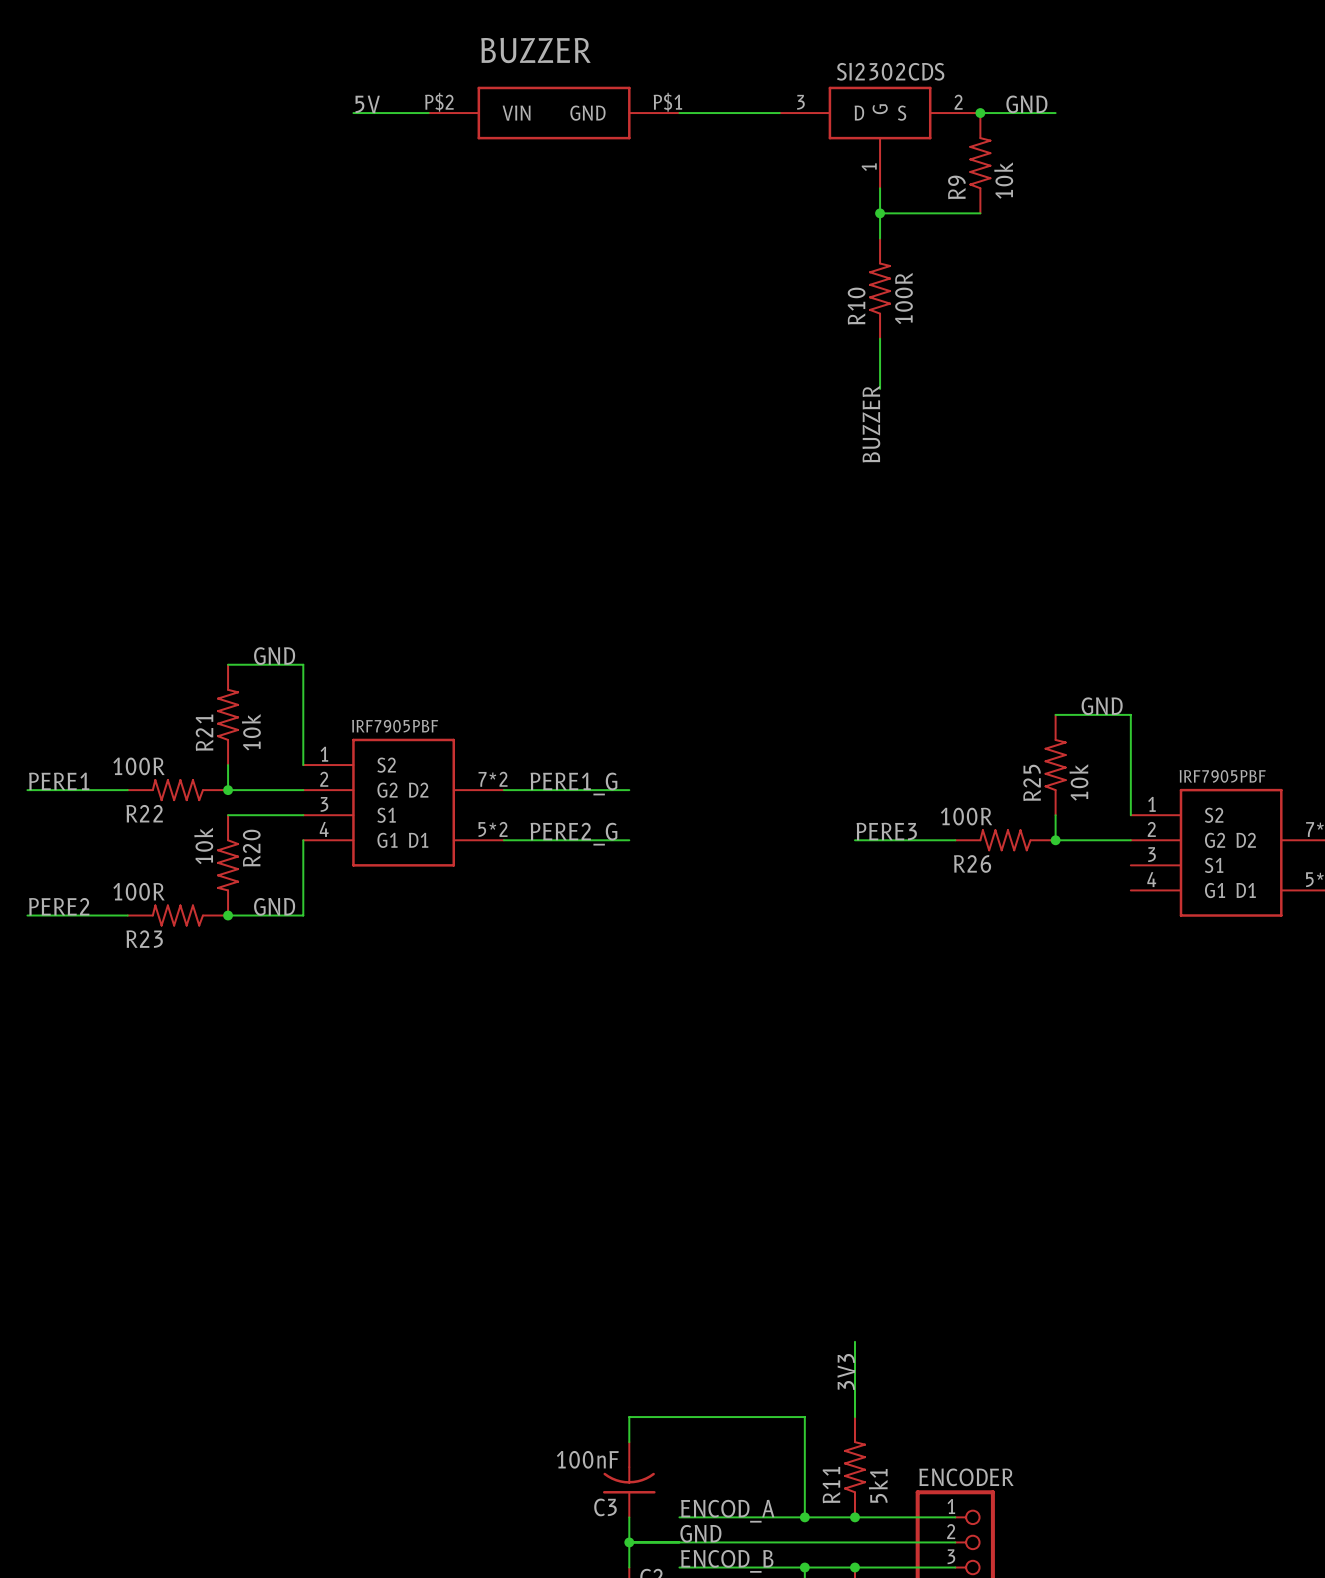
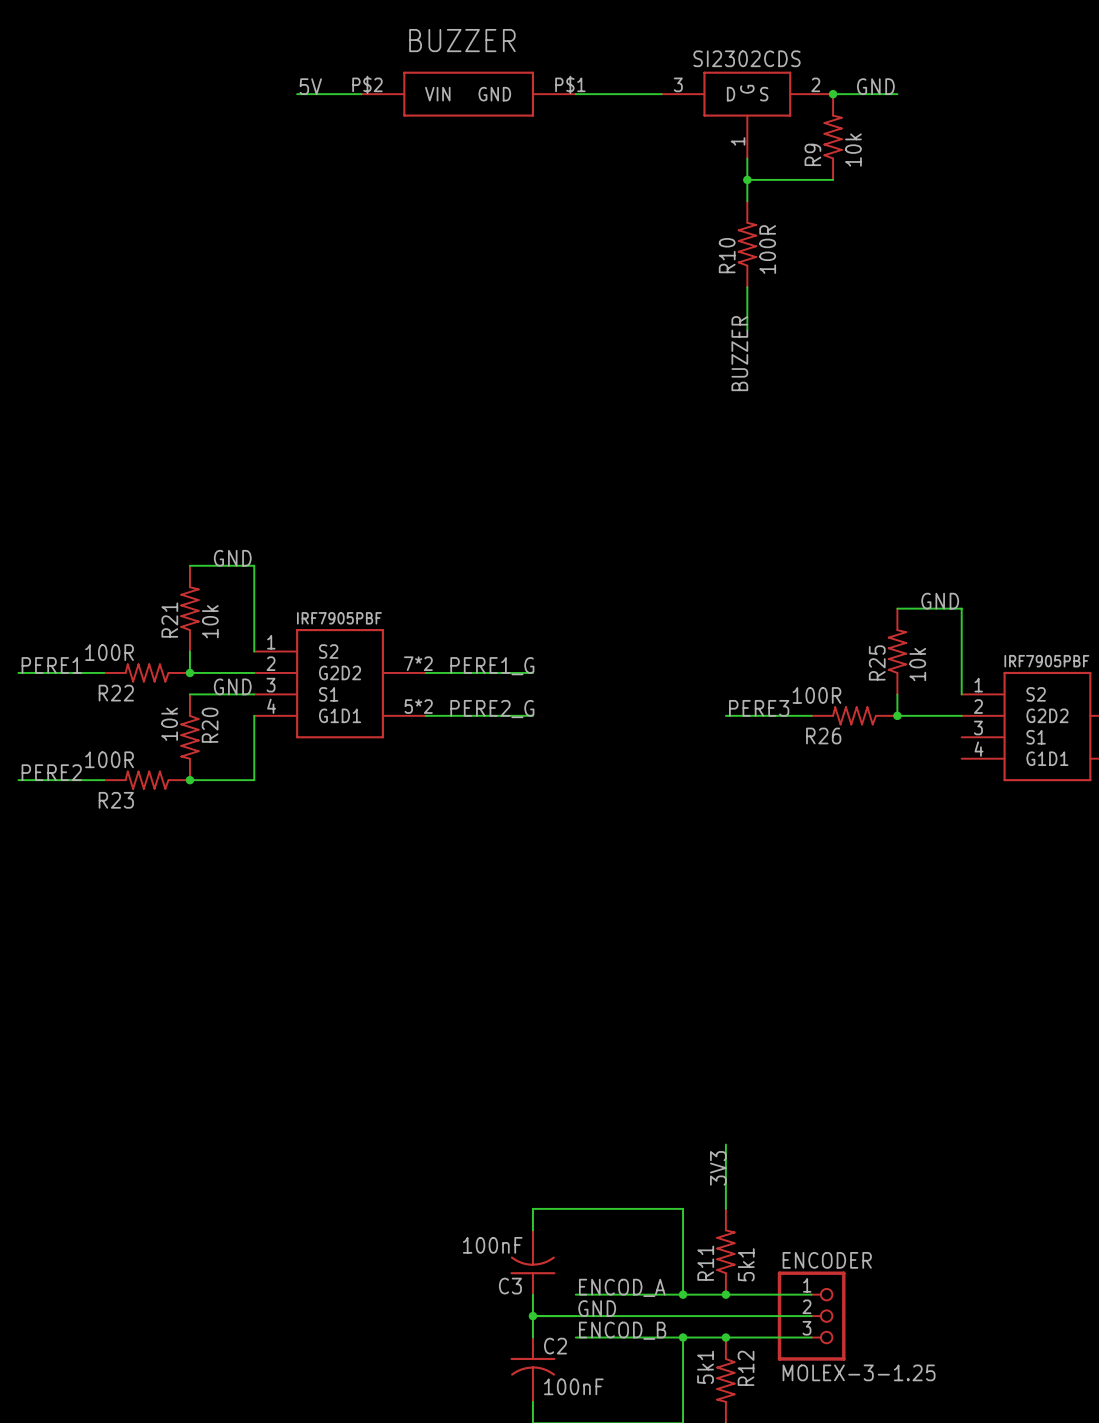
label position: GND (274, 906) -> GND (232, 686)

